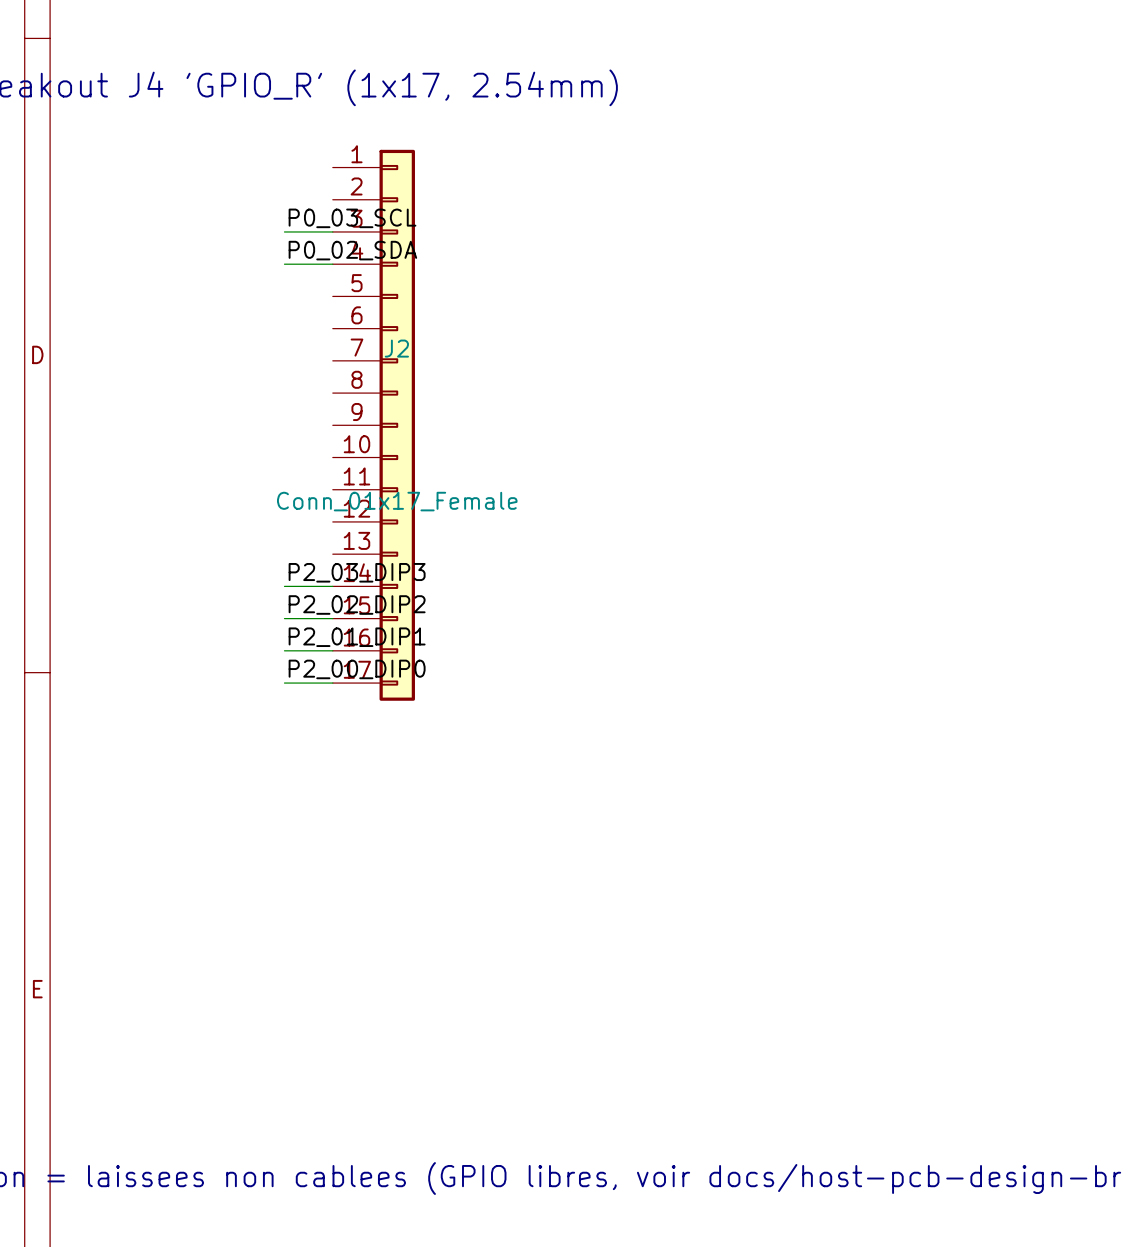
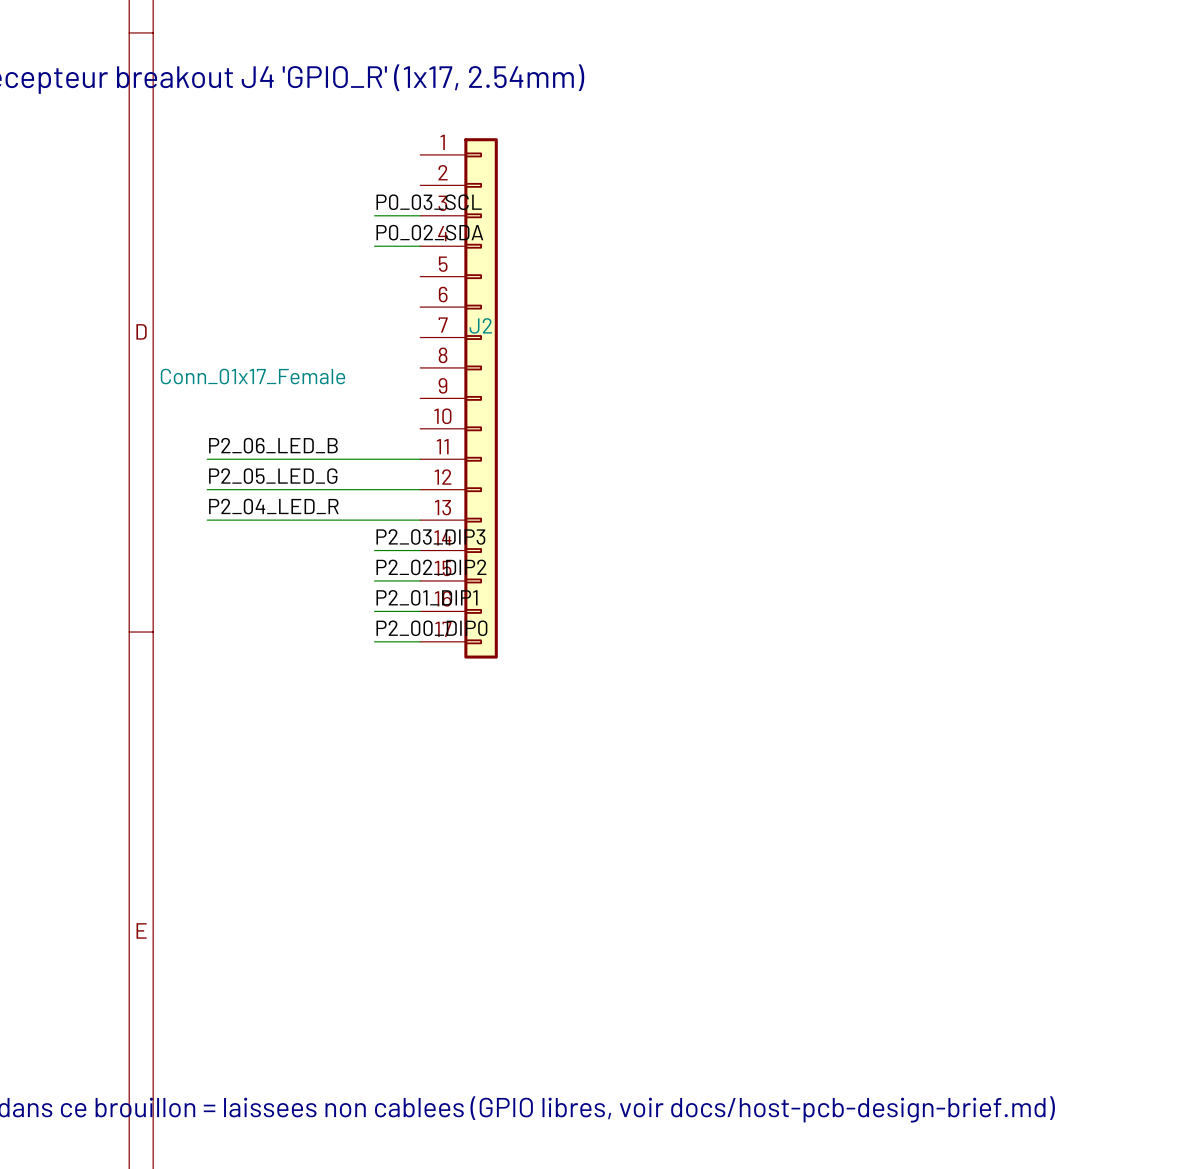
label: none -> P2_06_LED_B (273, 445)
wire: none -> (207, 459) (420, 459)
J2 value position: Conn_01x17_Female (397, 501) -> Conn_01x17_Female (252, 376)
label: none -> P2_05_LED_G (273, 476)
wire: none -> (207, 489) (420, 489)
label: none -> P2_04_LED_R (273, 506)
wire: none -> (207, 520) (420, 520)

